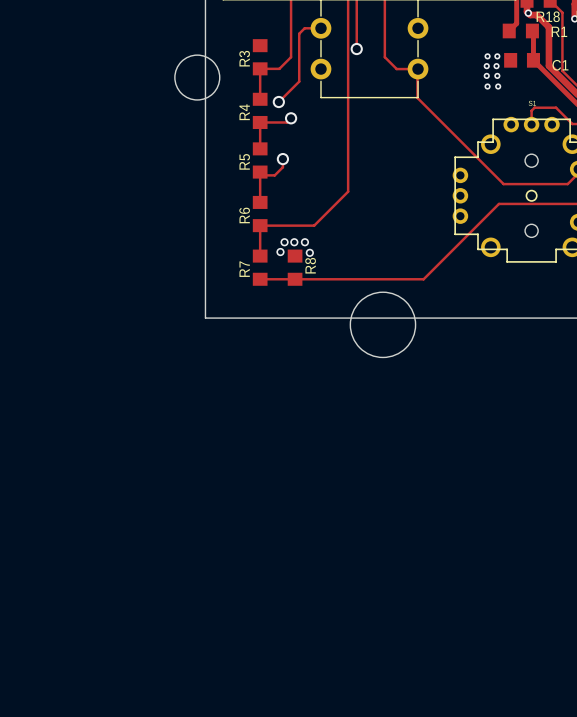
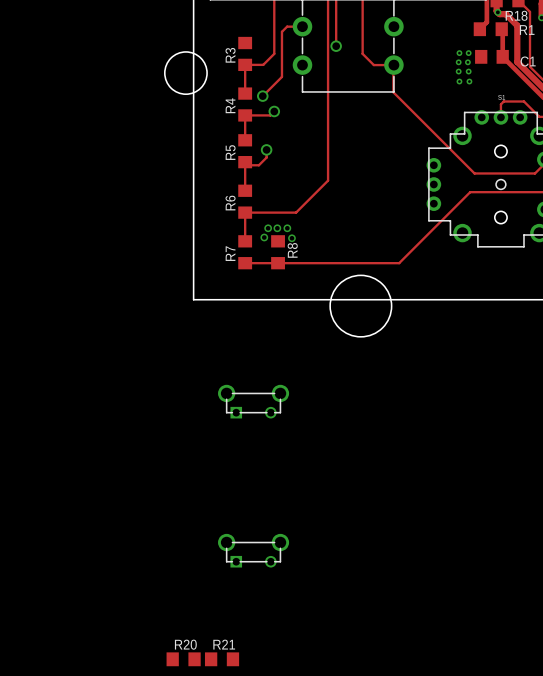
part: none -> (253, 401)
part: none -> (253, 550)
R20: none -> (183, 659)
R21: none -> (222, 659)

